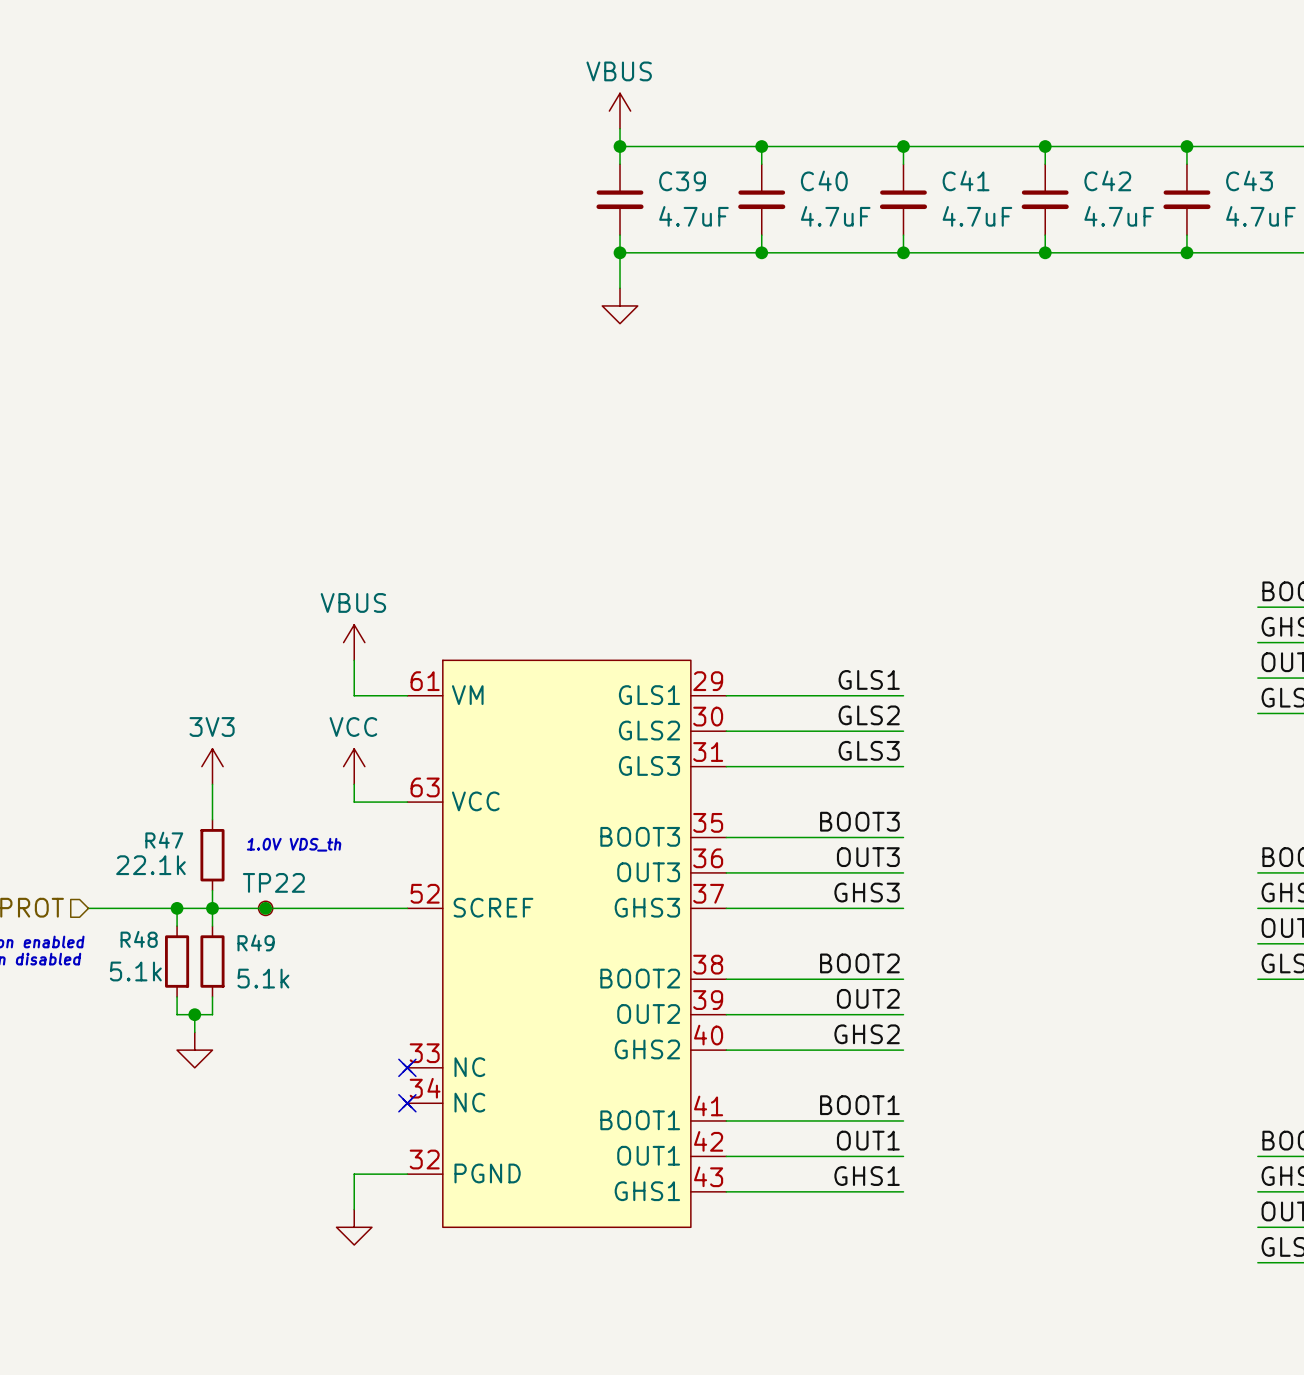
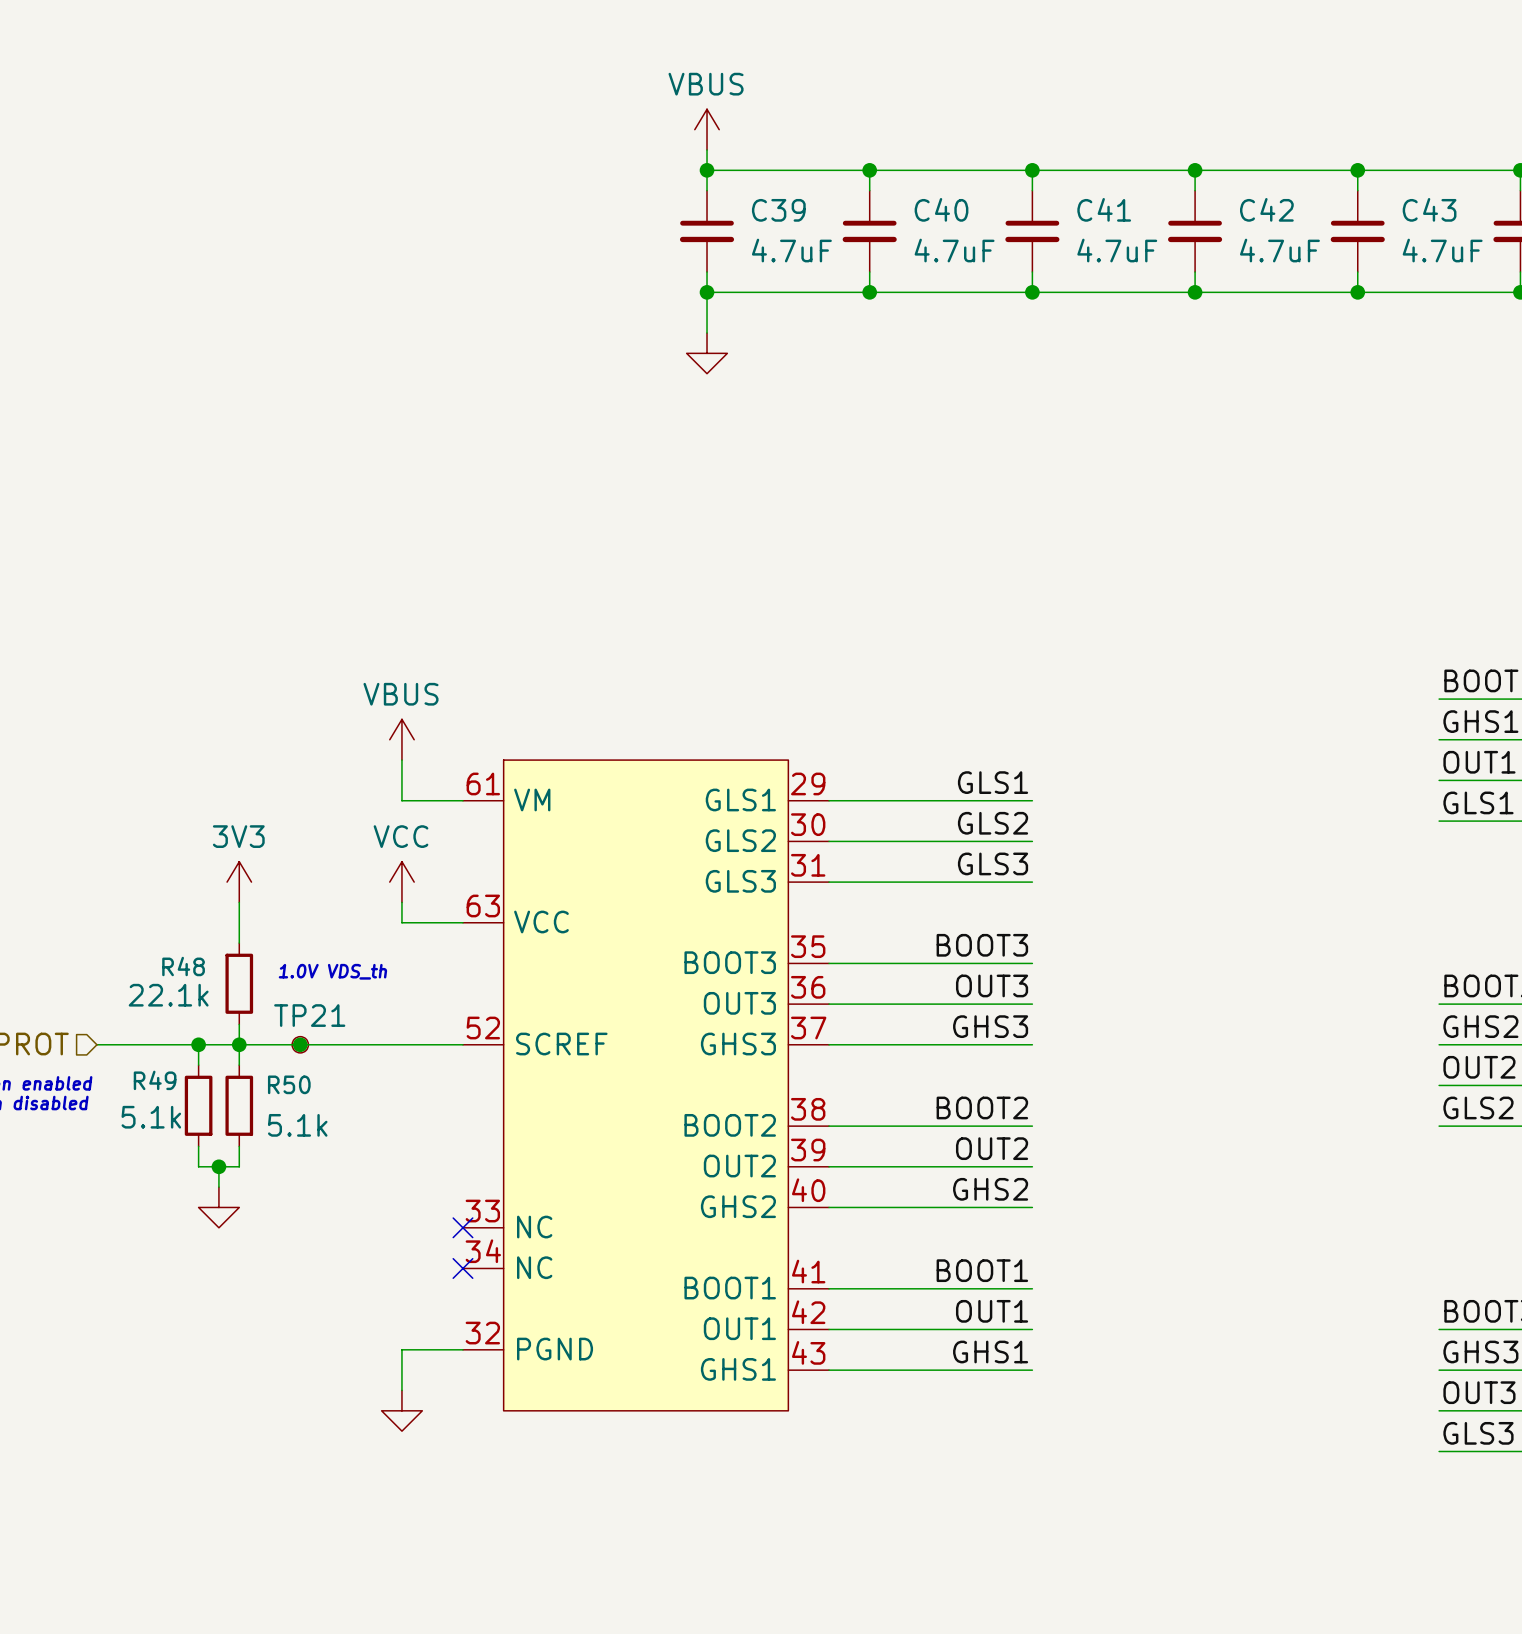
part symbol: [403, 660, 727, 1228] -> [462, 760, 830, 1411]
R47 name: R47 (164, 840) -> R48 (183, 966)
TP22 name: TP22 (273, 882) -> TP21 (309, 1015)
R48 name: R48 (139, 939) -> R49 (155, 1080)
R49 name: R49 (256, 942) -> R50 (289, 1084)

